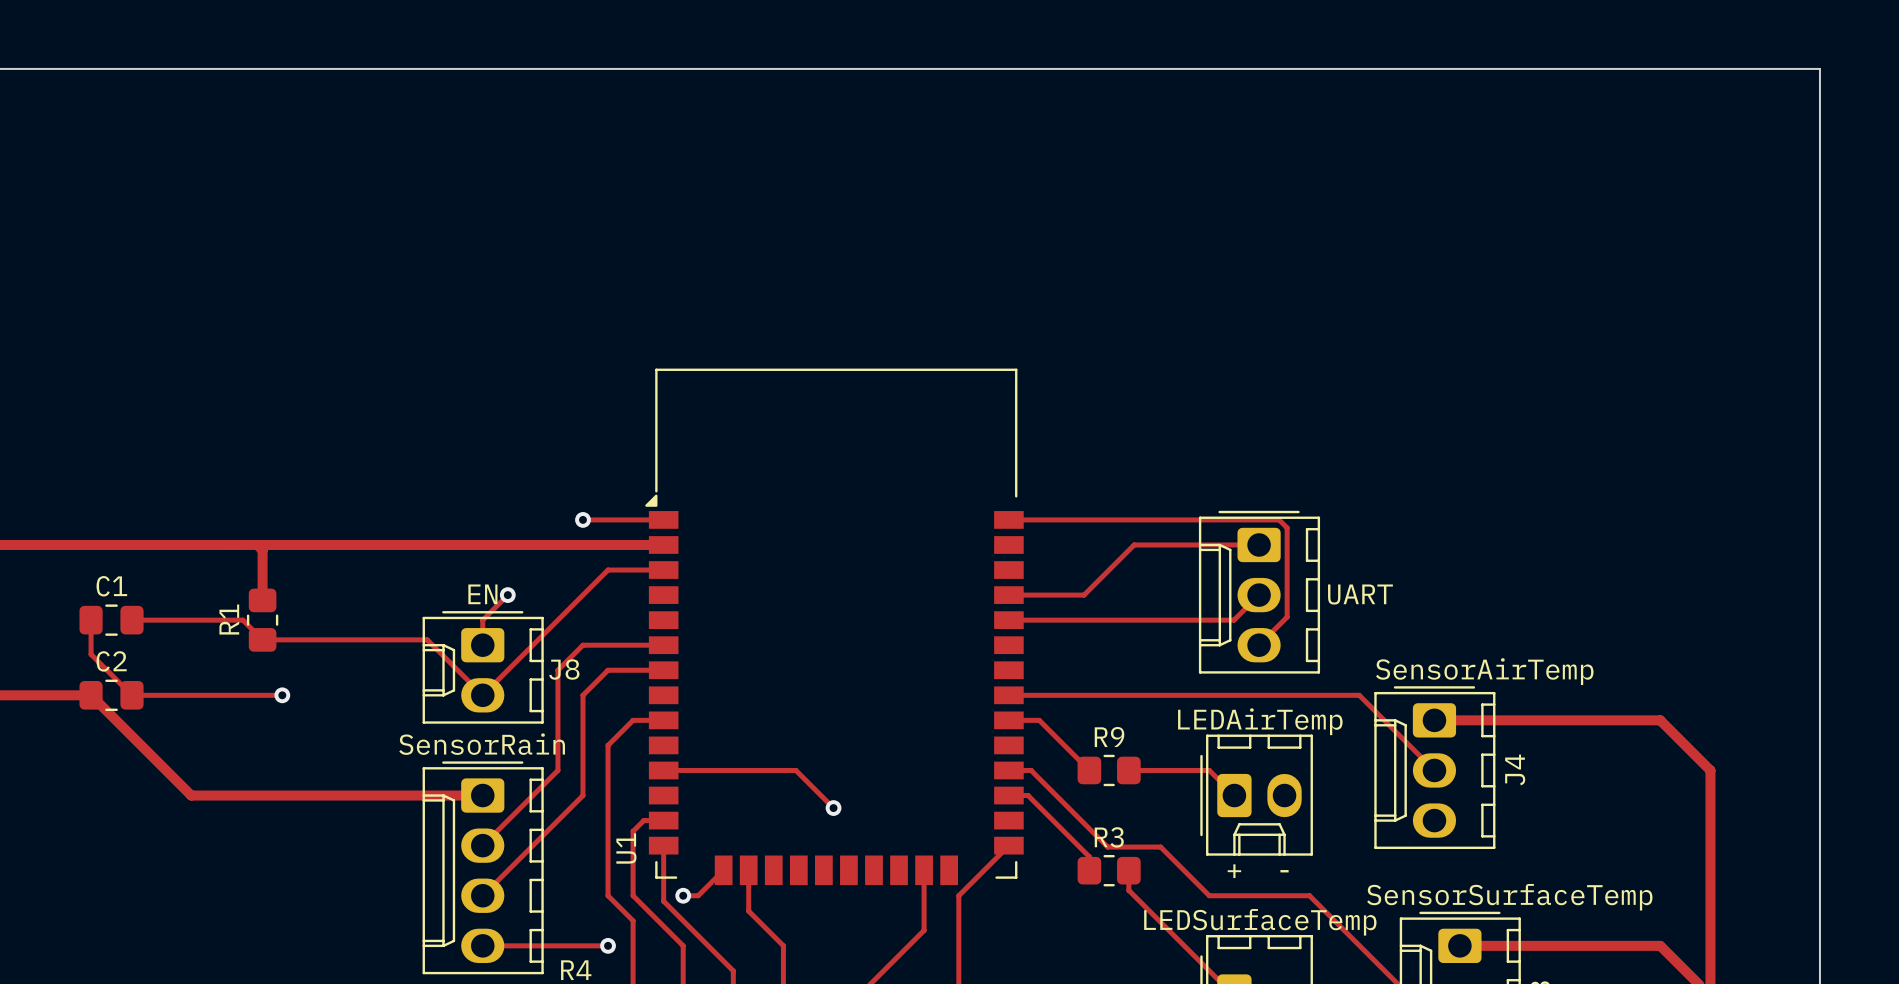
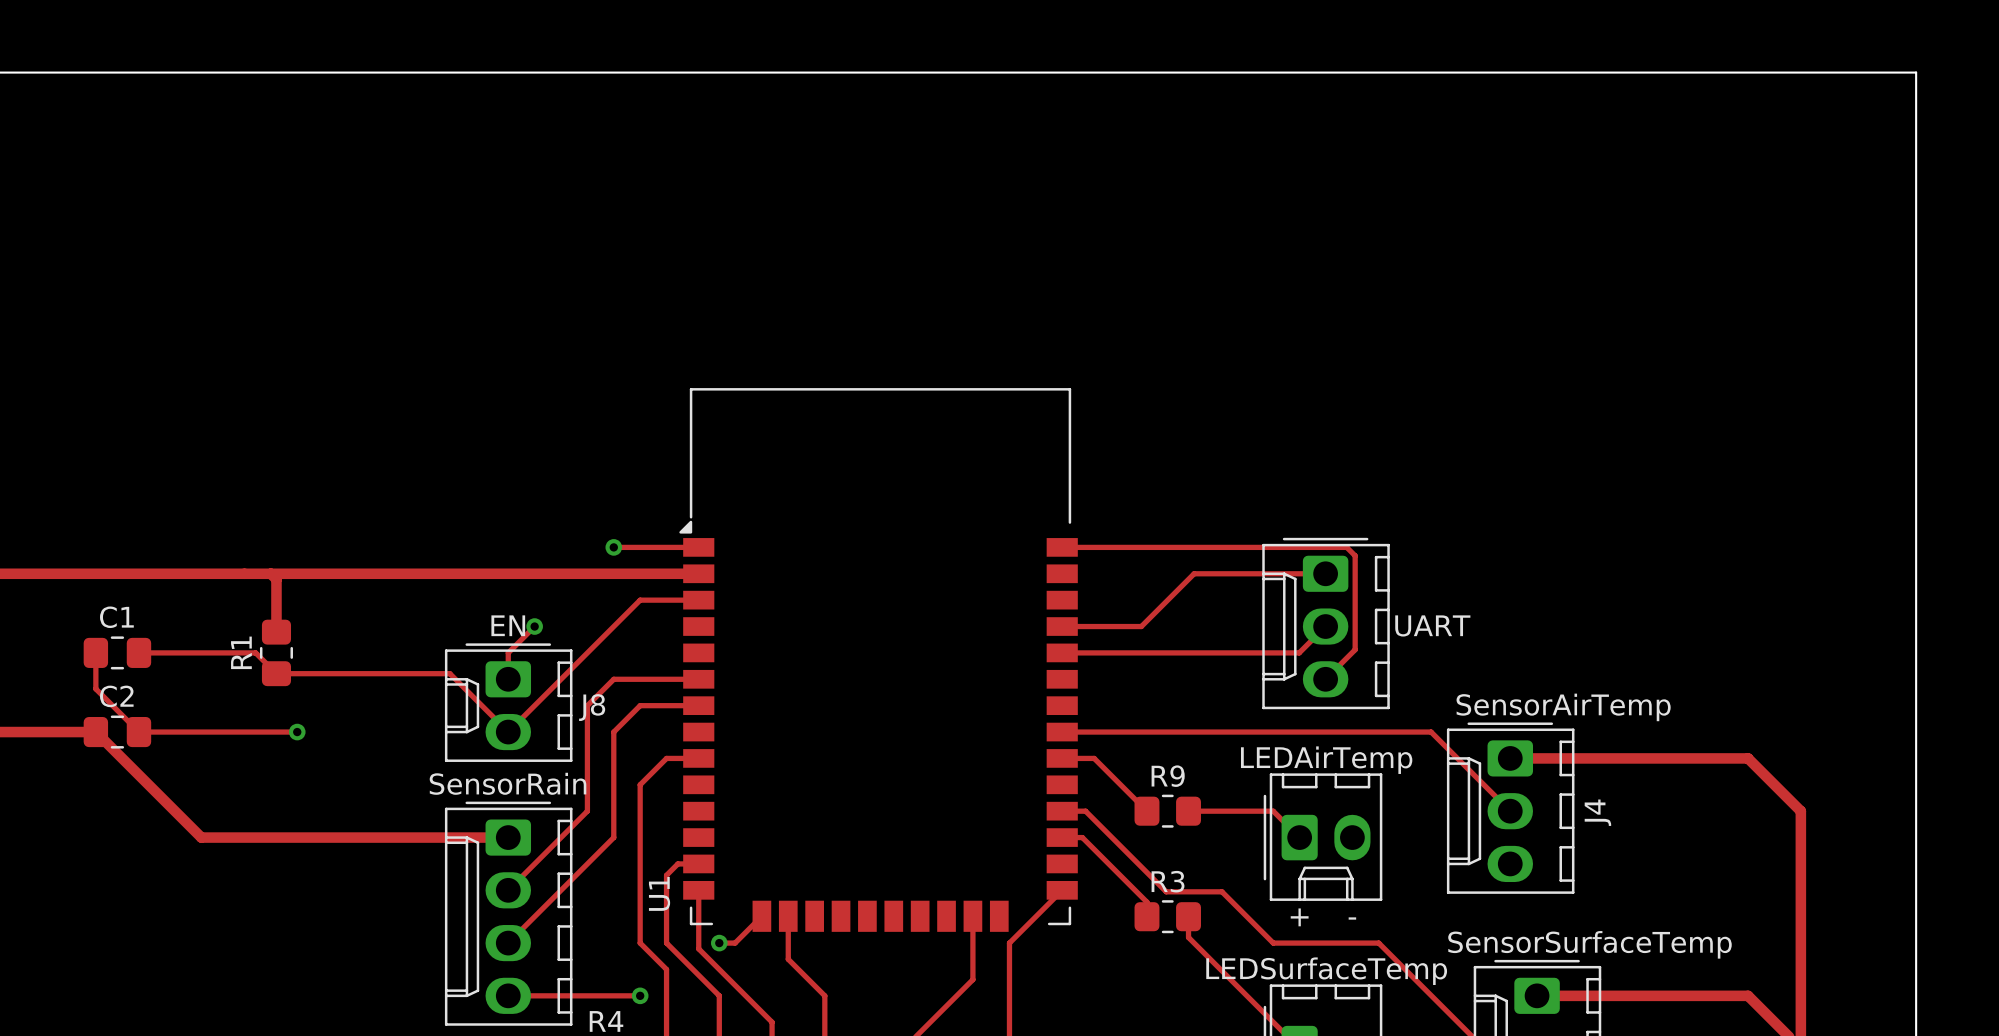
track: (663, 770) (795, 770) (833, 808) -> none
via: (833, 808) -> none

